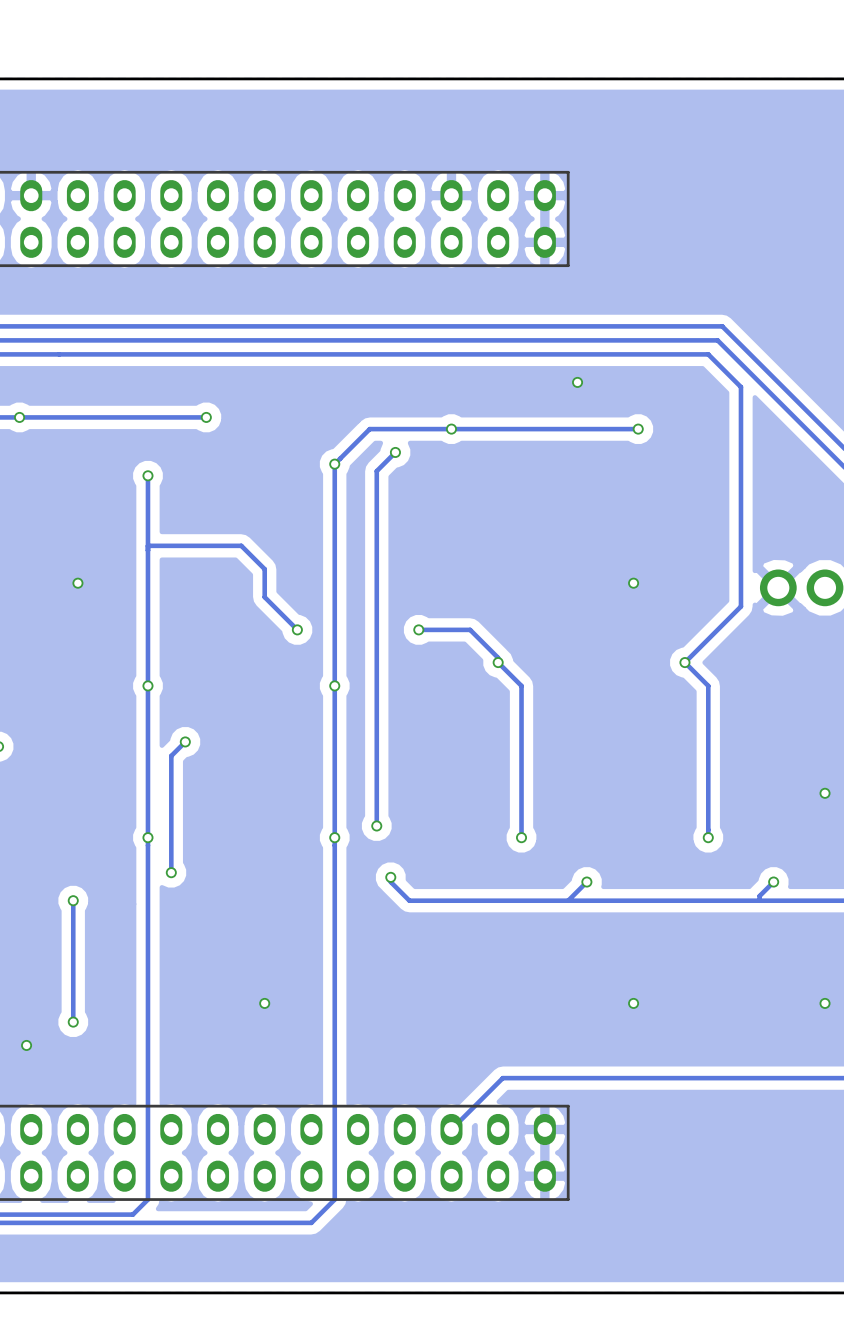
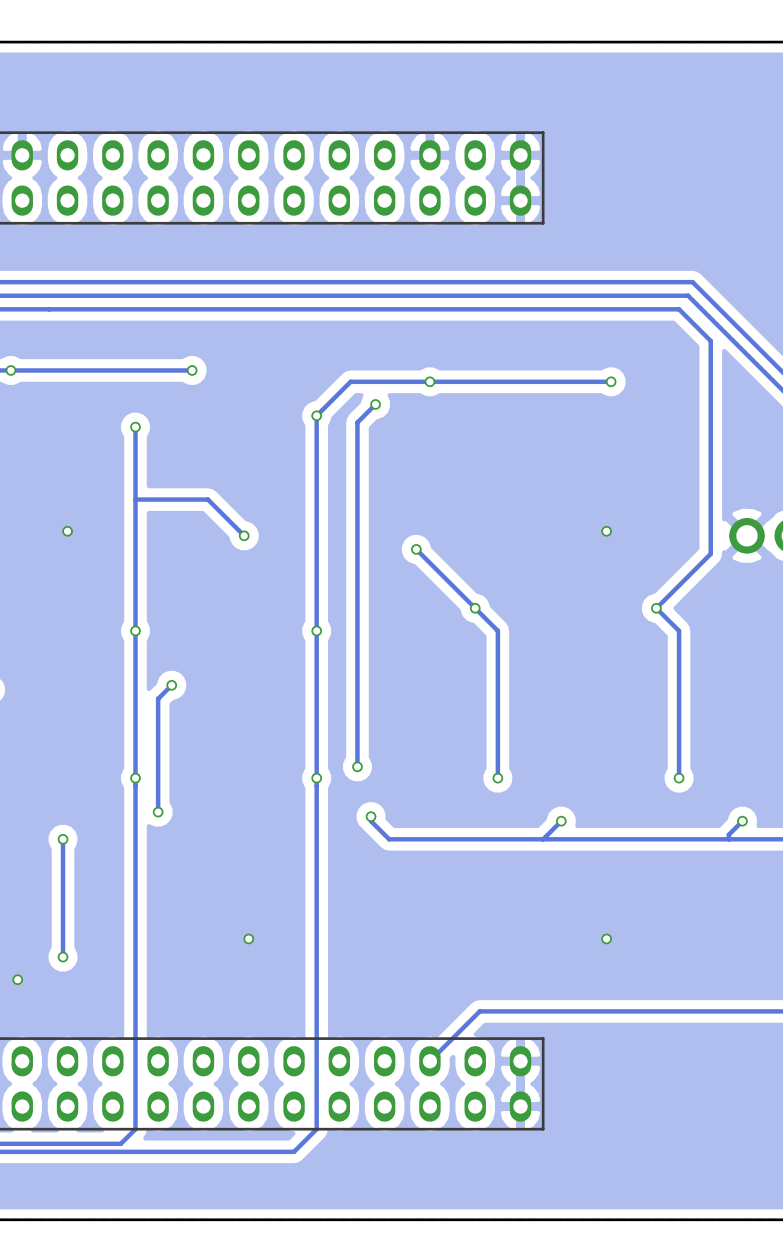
via: (577, 382) -> none
track: (147, 545) (241, 545) (264, 569) (264, 597) (297, 629) -> none
track: none -> (135, 499) (207, 499) (244, 535)
via position: (297, 629) -> (244, 535)
track: (418, 629) (470, 629) (498, 657) (498, 662) -> (416, 549) (475, 608)
via position: (418, 629) -> (416, 549)

